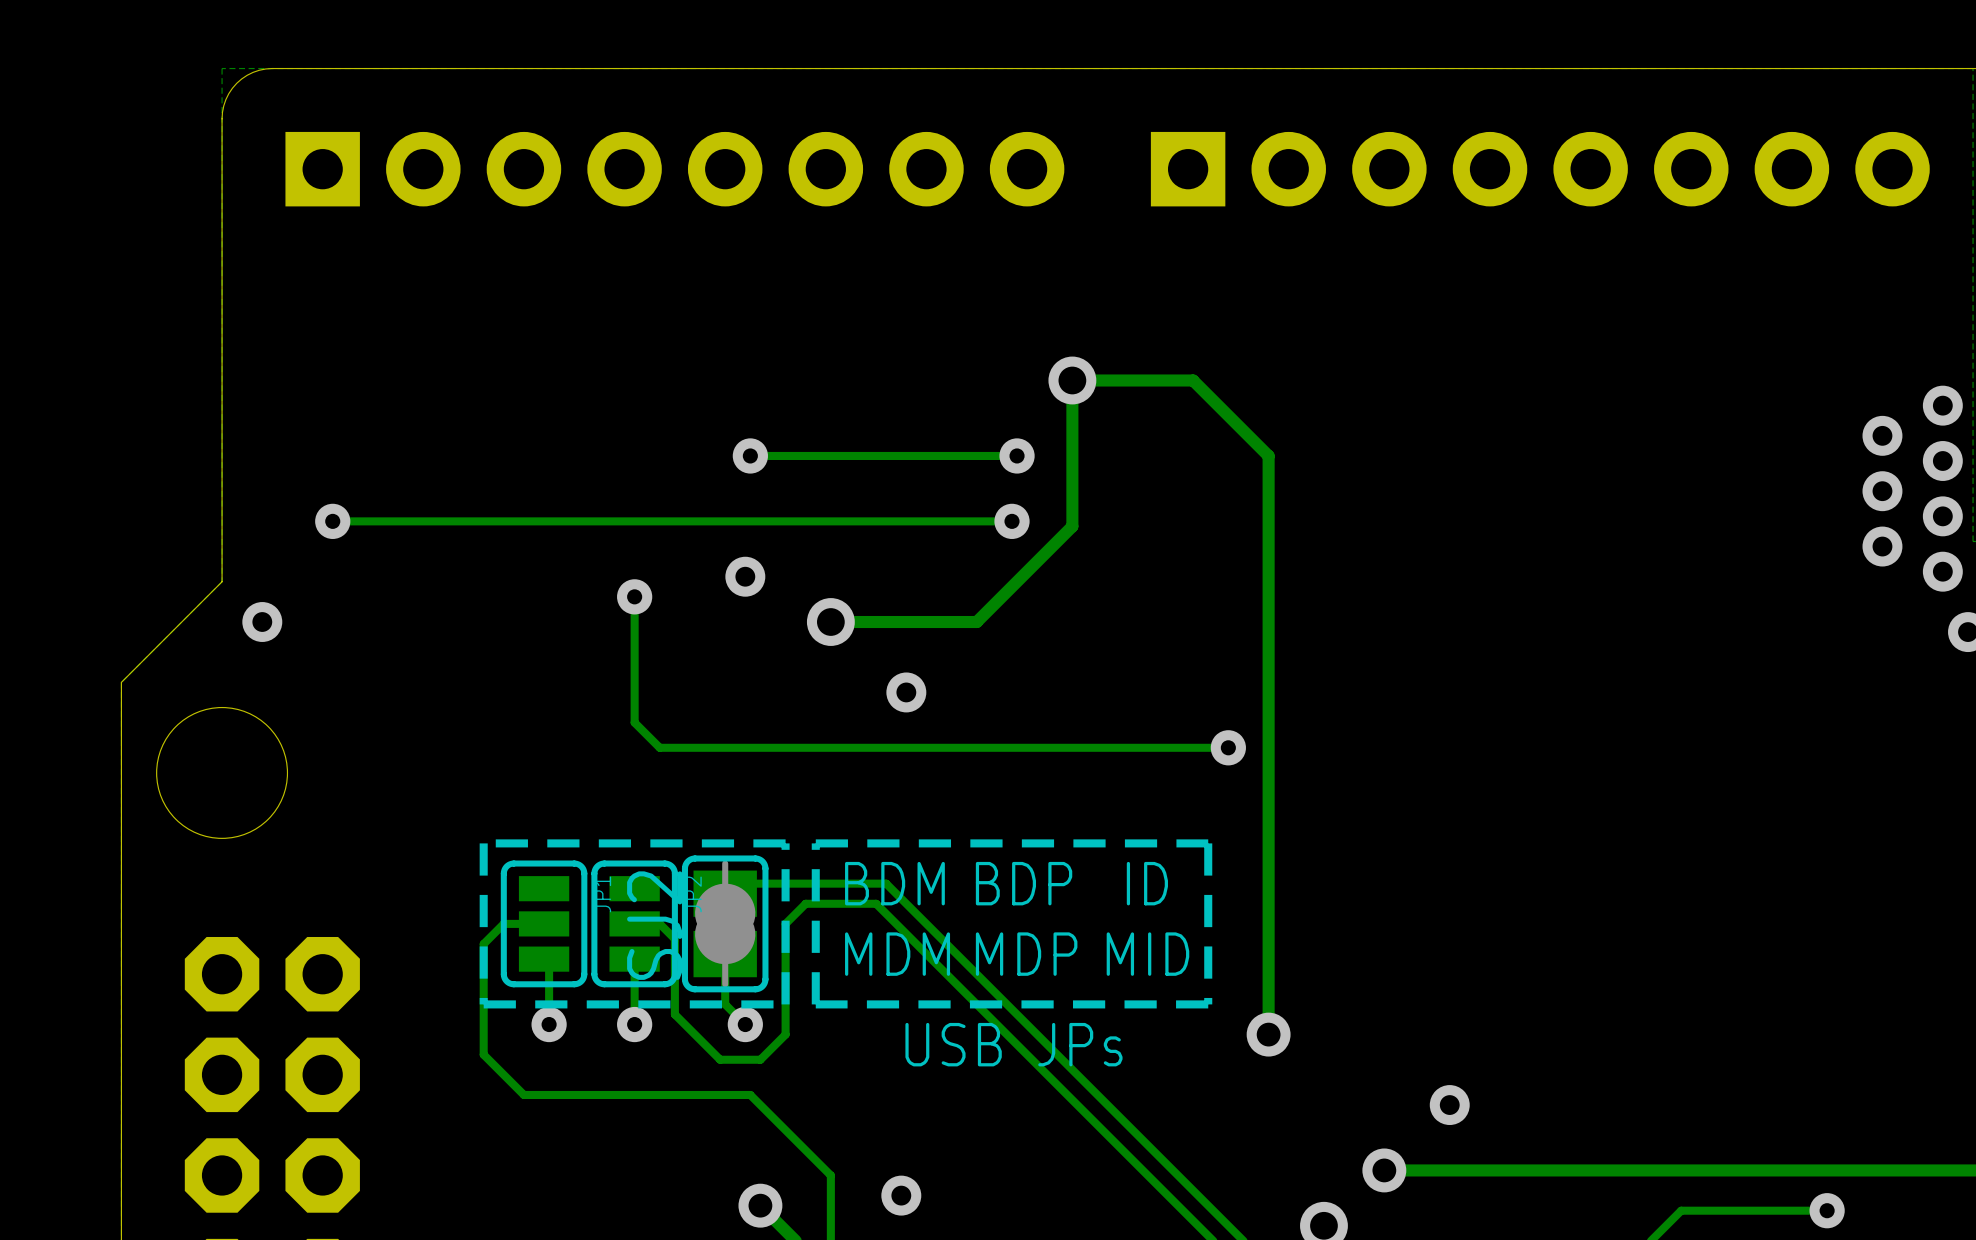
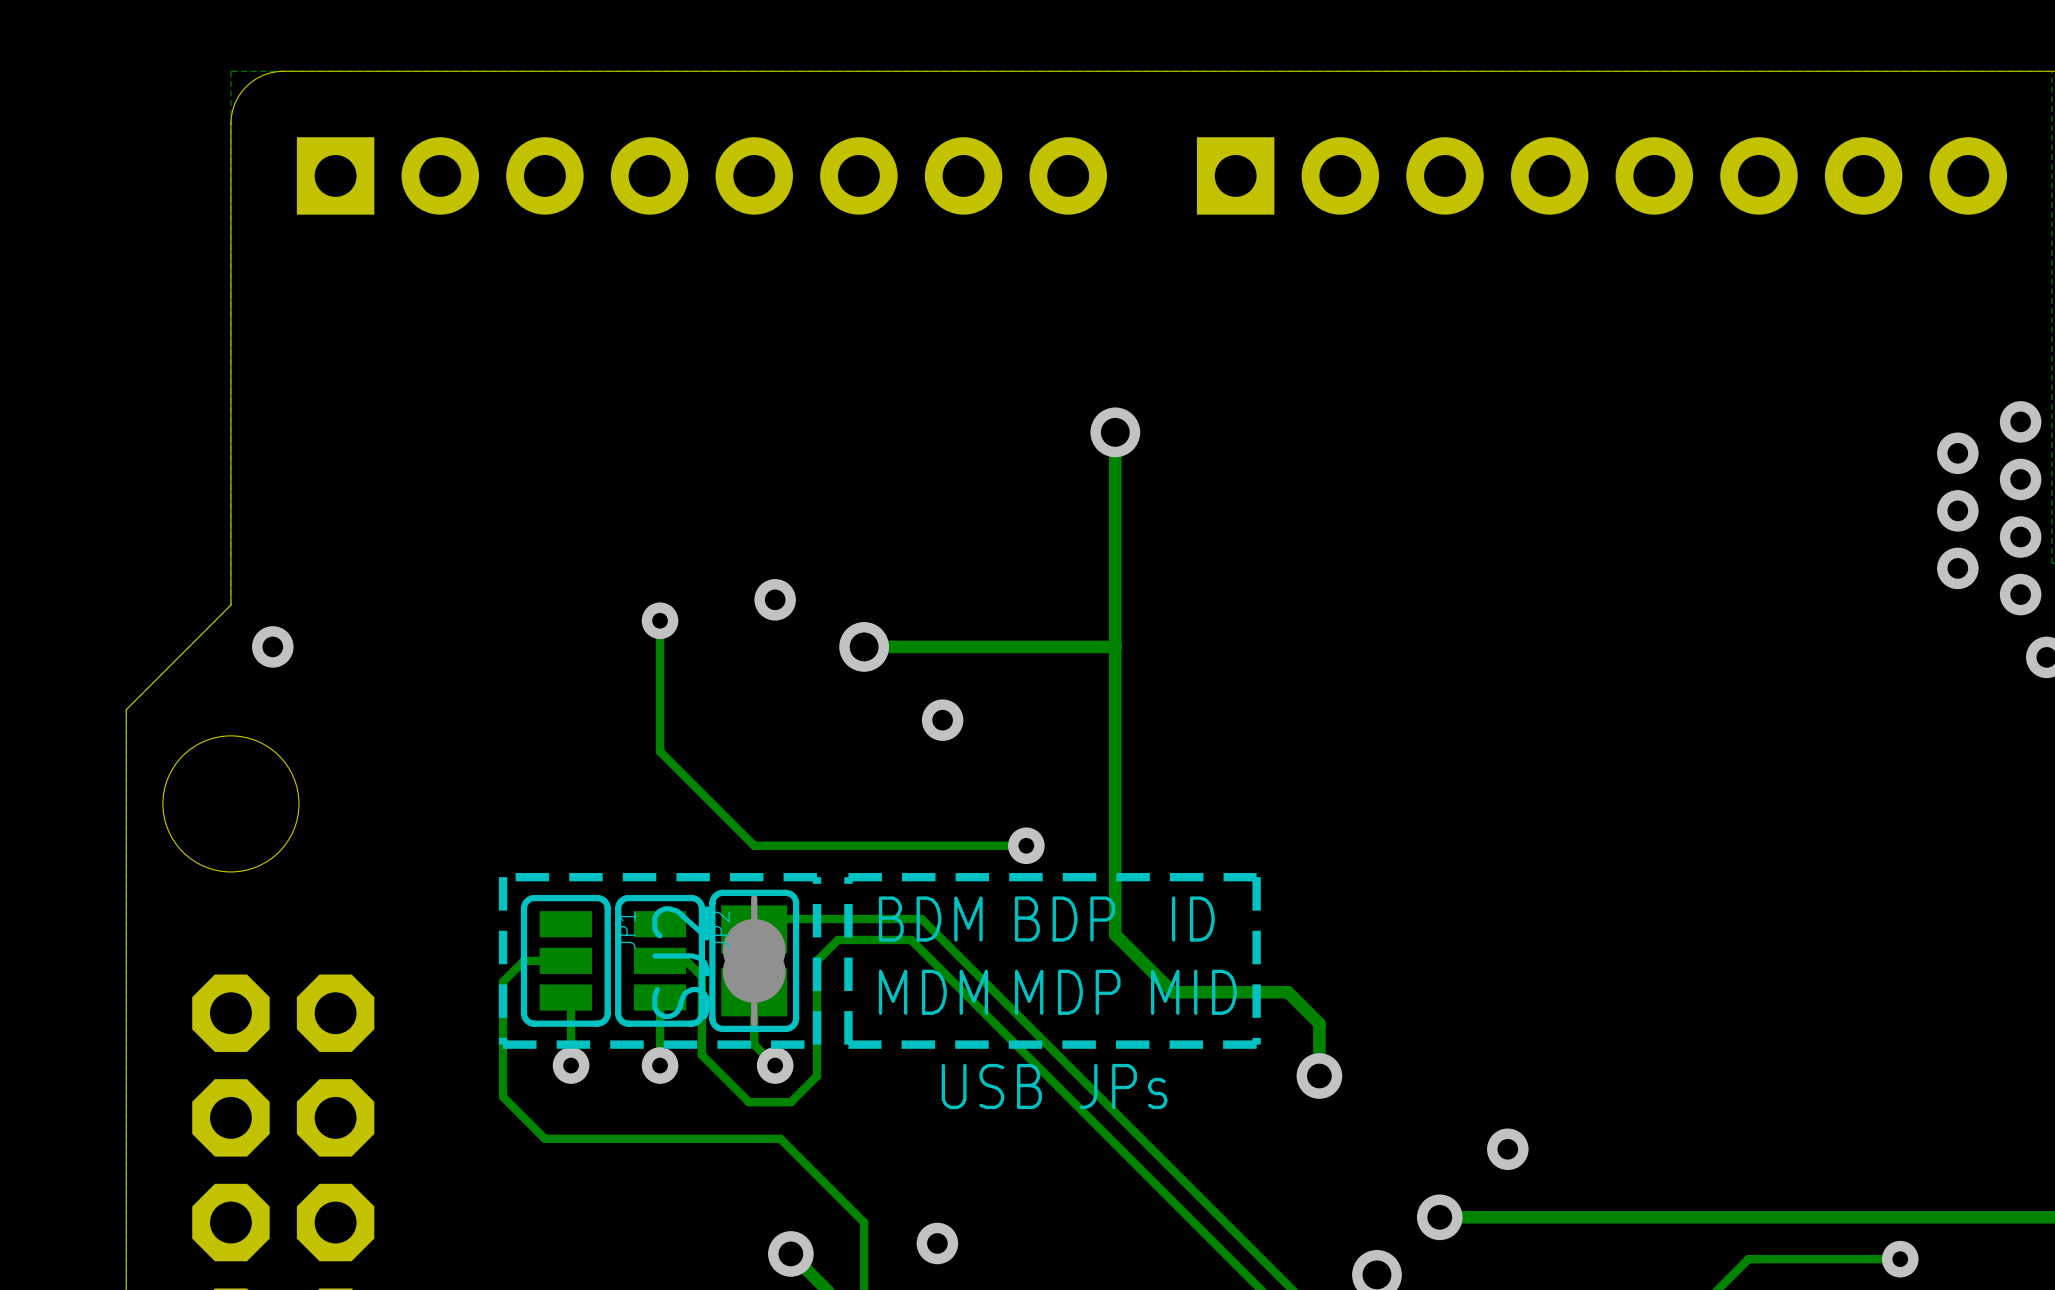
via position: (1072, 380) -> (1115, 432)
track: (1072, 415) (1072, 380) (1193, 380) (1268, 455) (1268, 984) -> (1115, 547) (1115, 934) (1172, 992) (1288, 992) (1319, 1023)
via: (750, 455) -> none
track: (1017, 455) (750, 455) -> none
via: (1017, 455) -> none
via: (332, 521) -> none
track: (1012, 521) (332, 521) -> none
via: (1012, 521) -> none
track: (1072, 526) (976, 622) -> (1115, 646) (1015, 646)
track: (1228, 747) (659, 747) -> (1026, 845) (754, 845) (686, 777)
via: (1228, 747) -> none
via: none -> (1026, 845)

